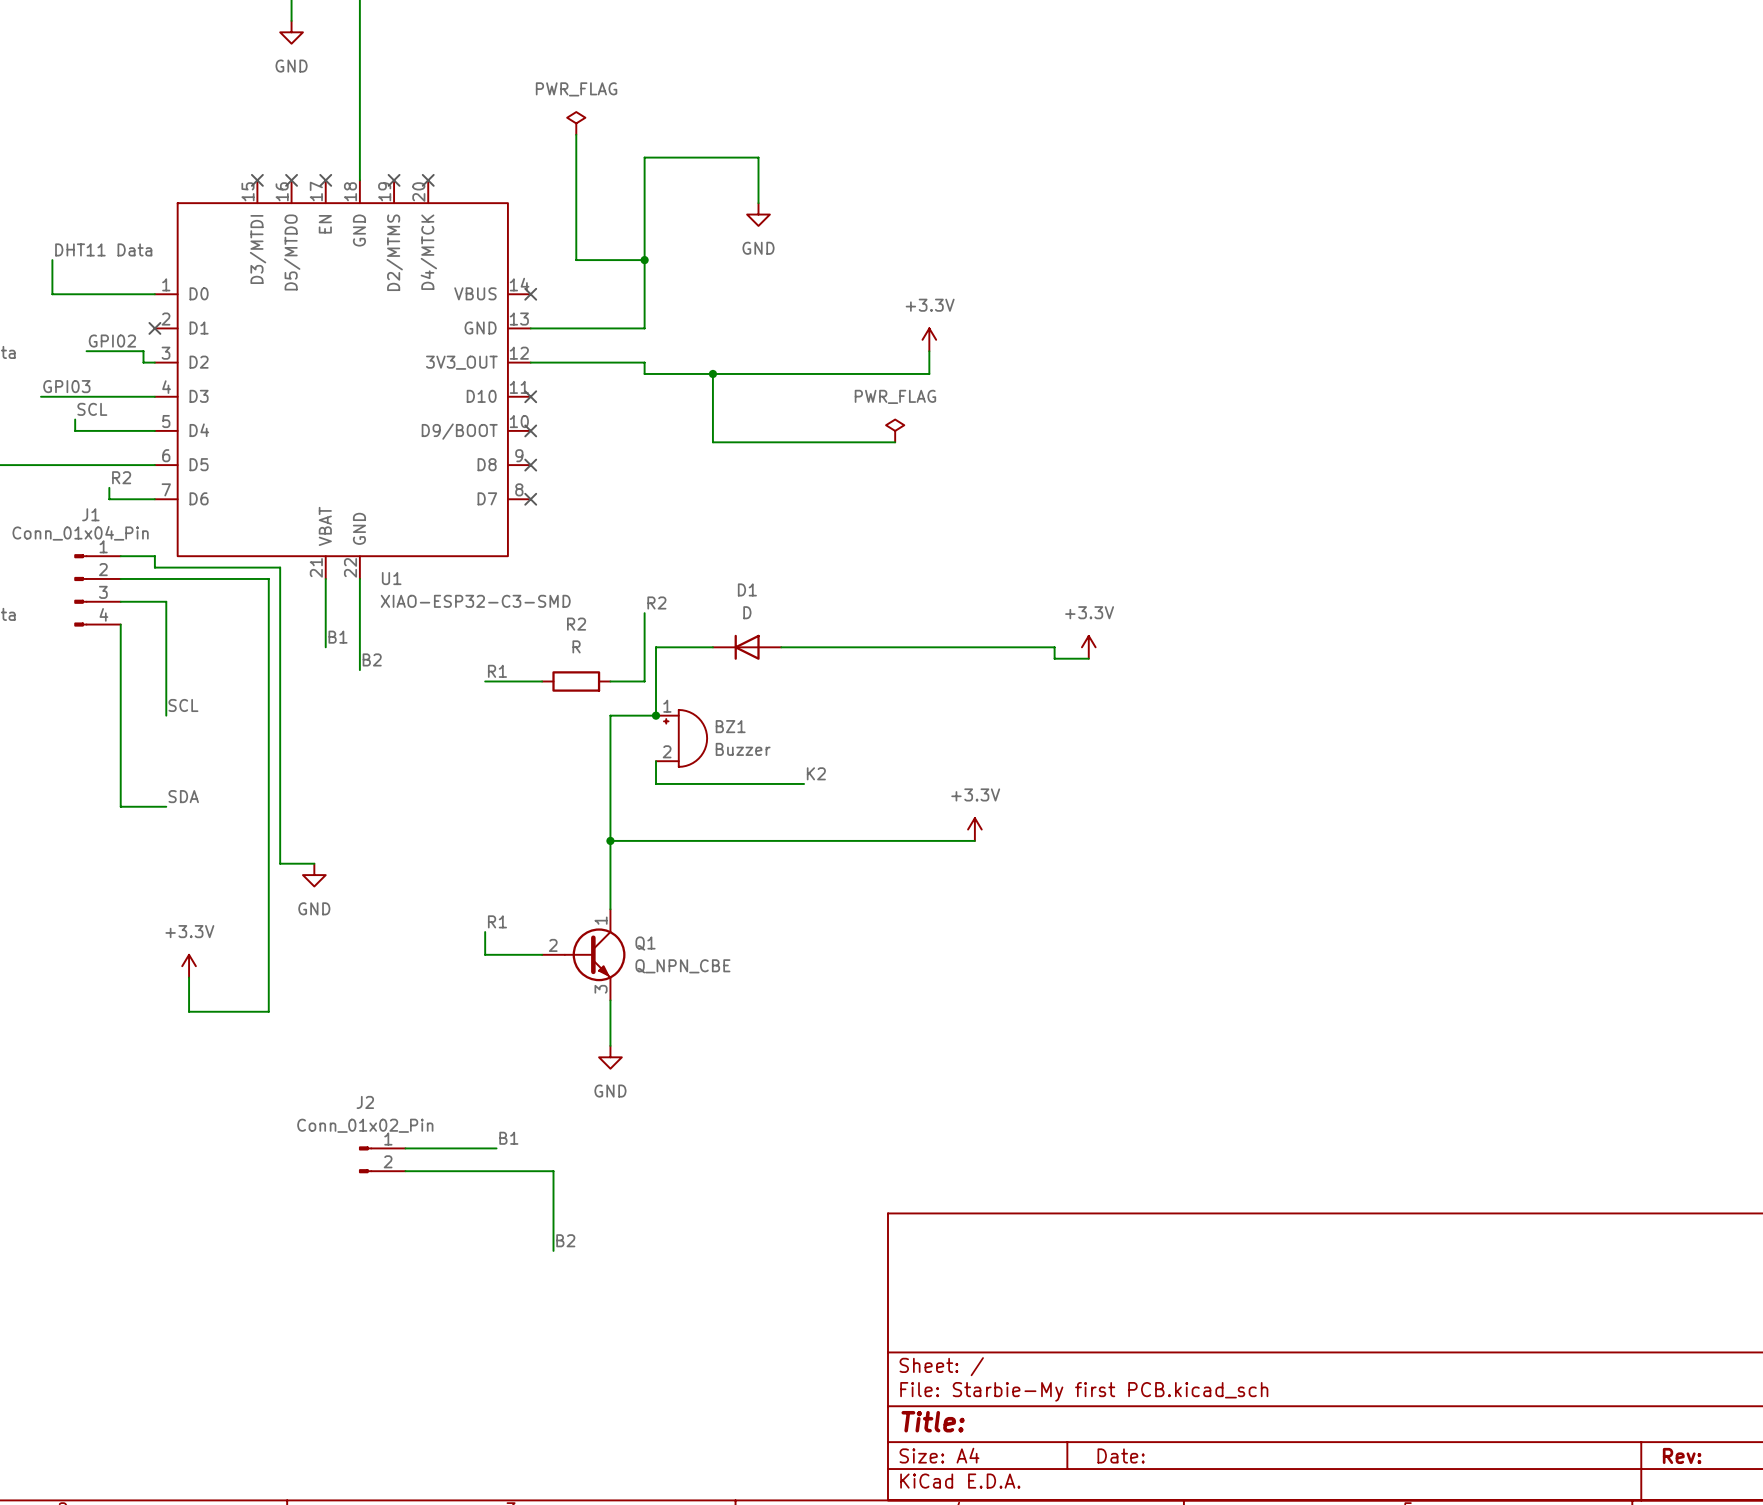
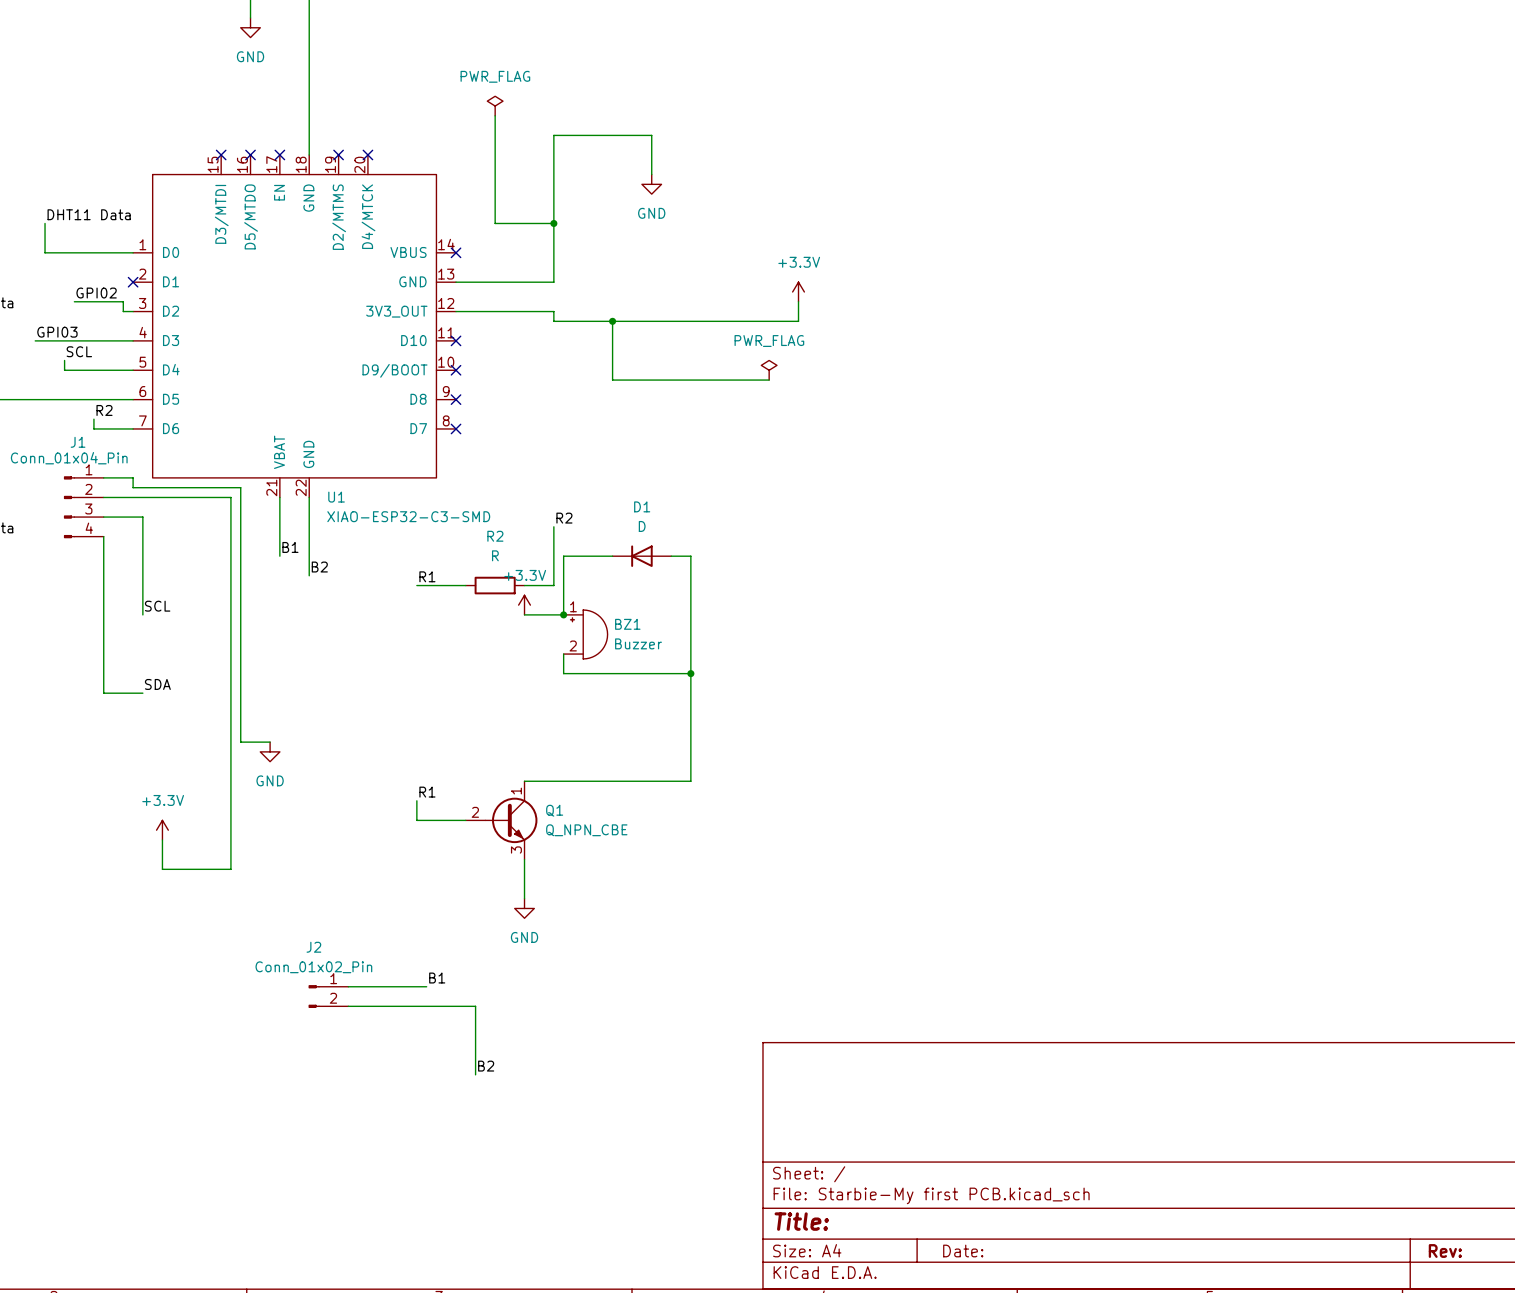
wire: (804, 647) (1054, 647) (1054, 658) (1088, 658) -> none
power symbol: +3.3V (1088, 647) -> none
power symbol: none -> +3.3V (524, 605)
wire: (610, 715) (610, 909) -> (690, 556) (690, 781) (524, 781)
label: K2 (816, 773) -> none
junction: none -> (690, 673)
power symbol: +3.3V (974, 829) -> none
wire: (610, 840) (974, 840) -> none
junction: (610, 840) -> none

